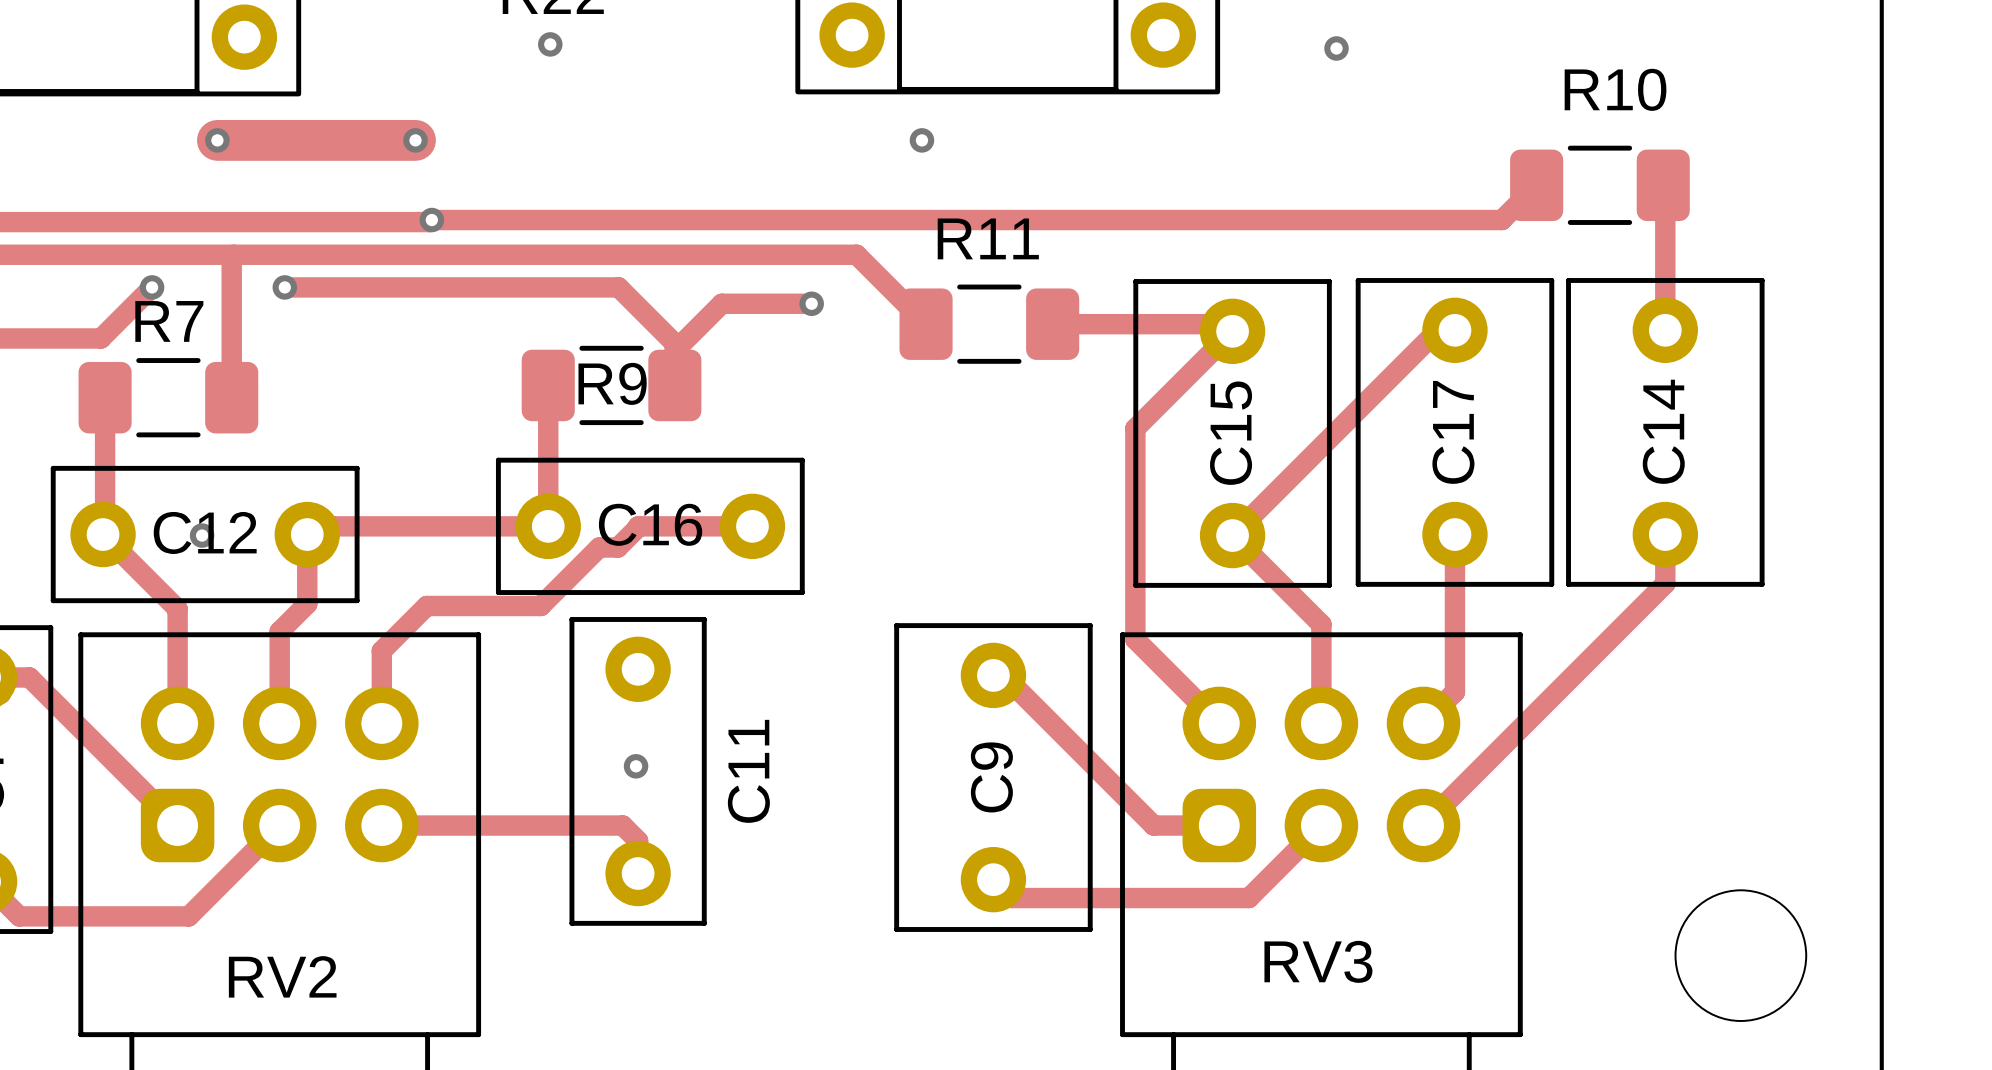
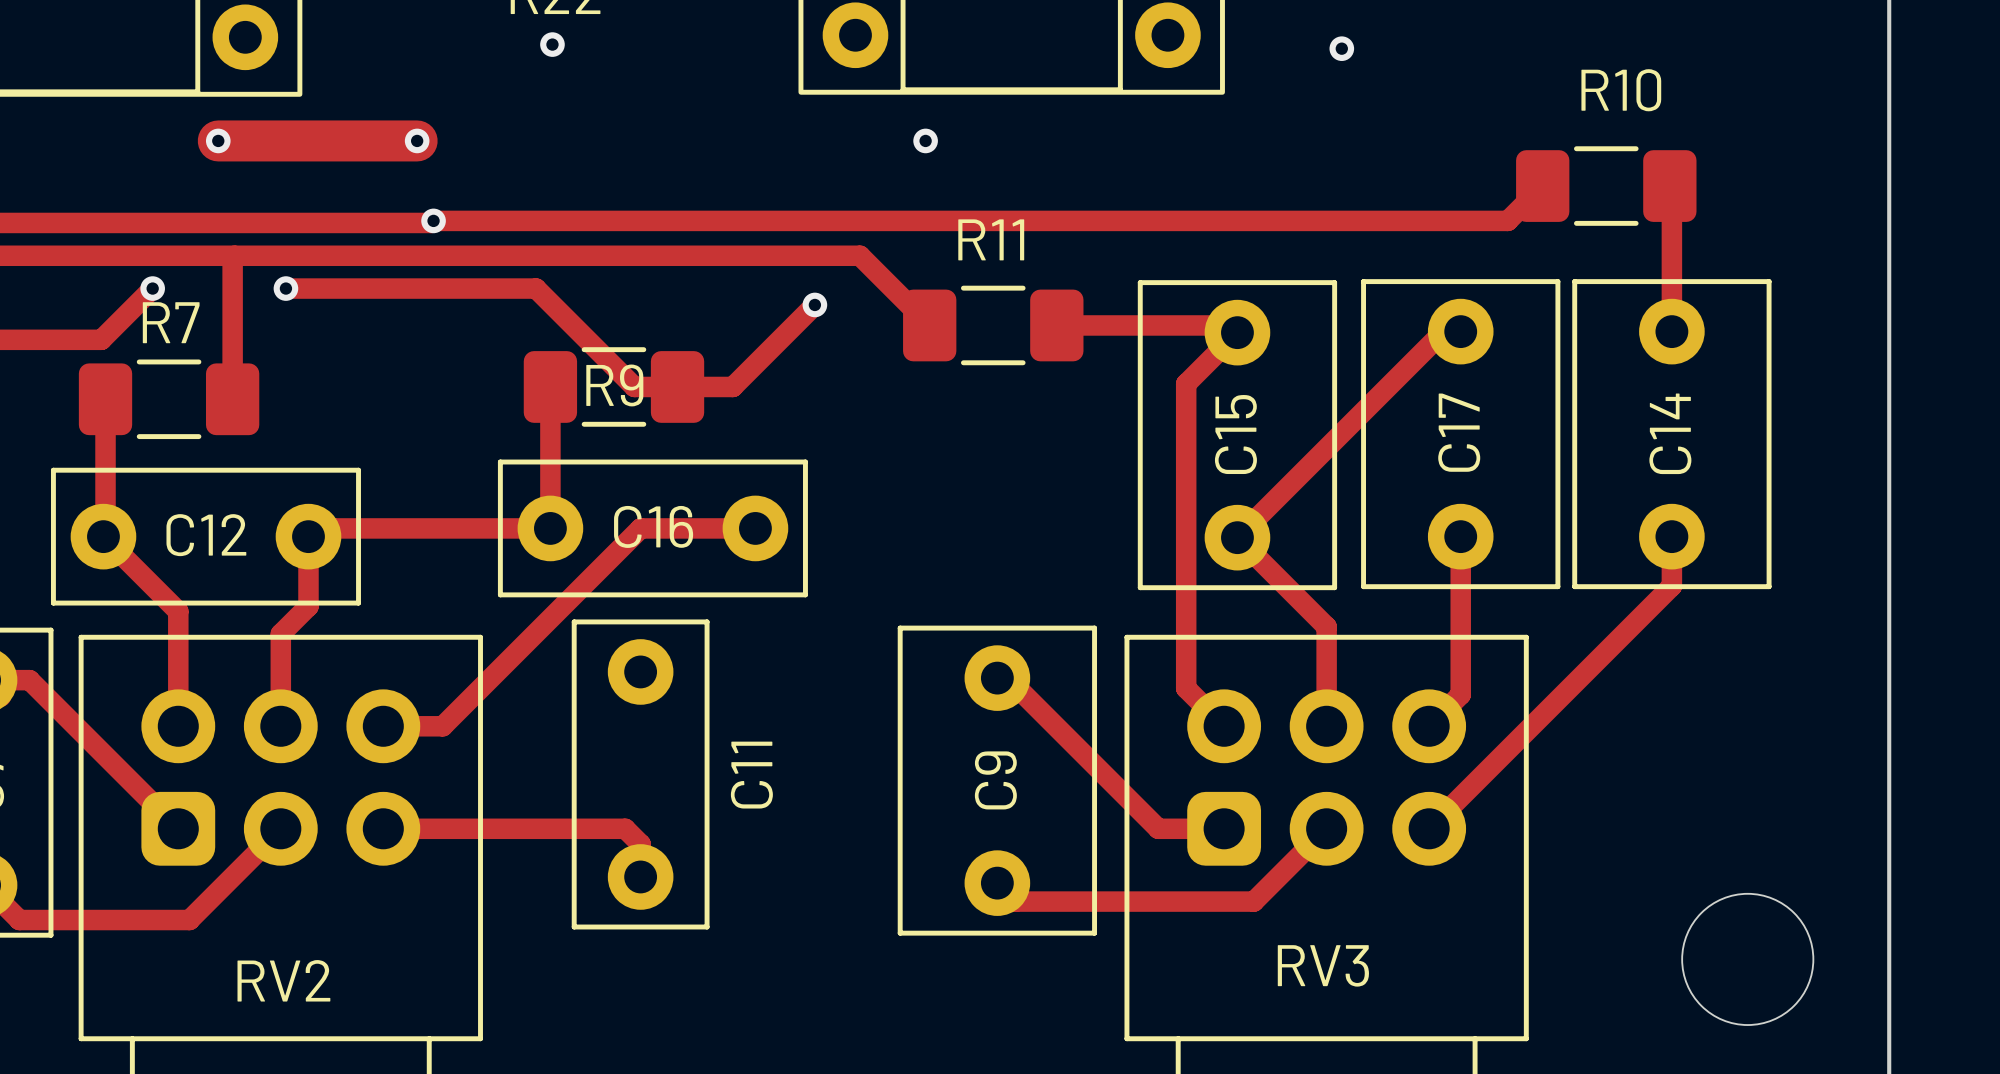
track: (533, 287) (618, 287) (674, 343) (674, 385) -> none
track: (811, 303) (721, 303) (674, 350) -> (814, 304) (732, 386) (634, 386) (536, 288)
track: (1181, 382) (1135, 428) (1135, 639) (1181, 685) -> (1186, 383) (1186, 688)
track: (638, 526) (617, 547) (599, 547) (540, 606) (426, 606) (381, 650) (381, 723) -> (640, 528) (442, 726) (383, 726)
via: (202, 535) -> none
via: (636, 766) -> none

